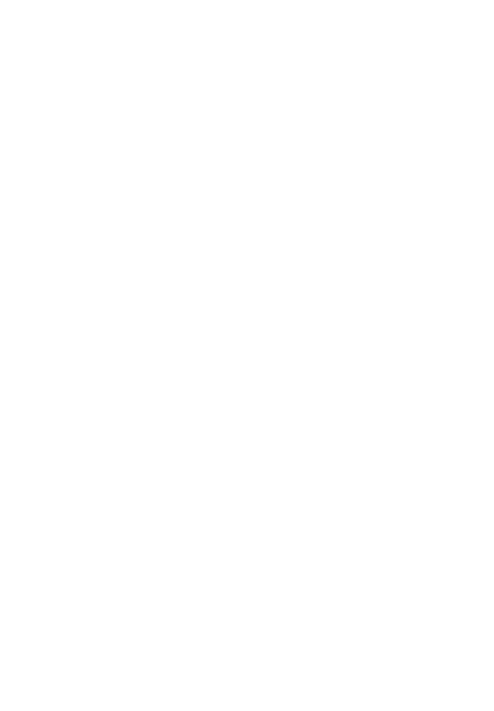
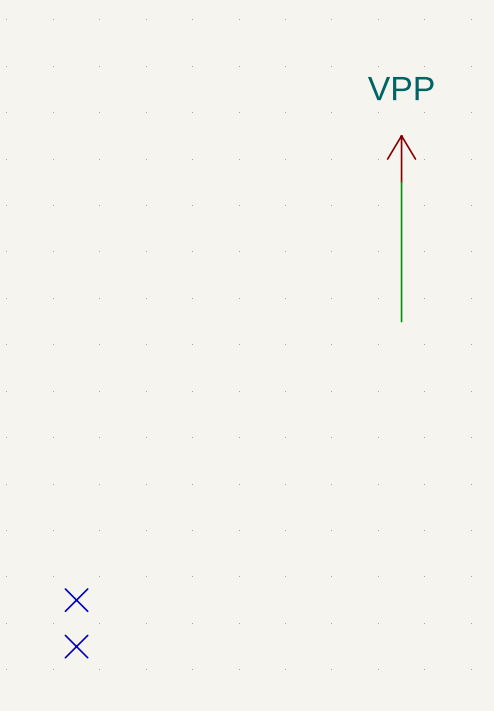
power symbol: none -> VPP (401, 159)
wire: none -> (401, 182) (401, 321)
no-connect mark: none -> (76, 600)
no-connect mark: none -> (76, 646)

